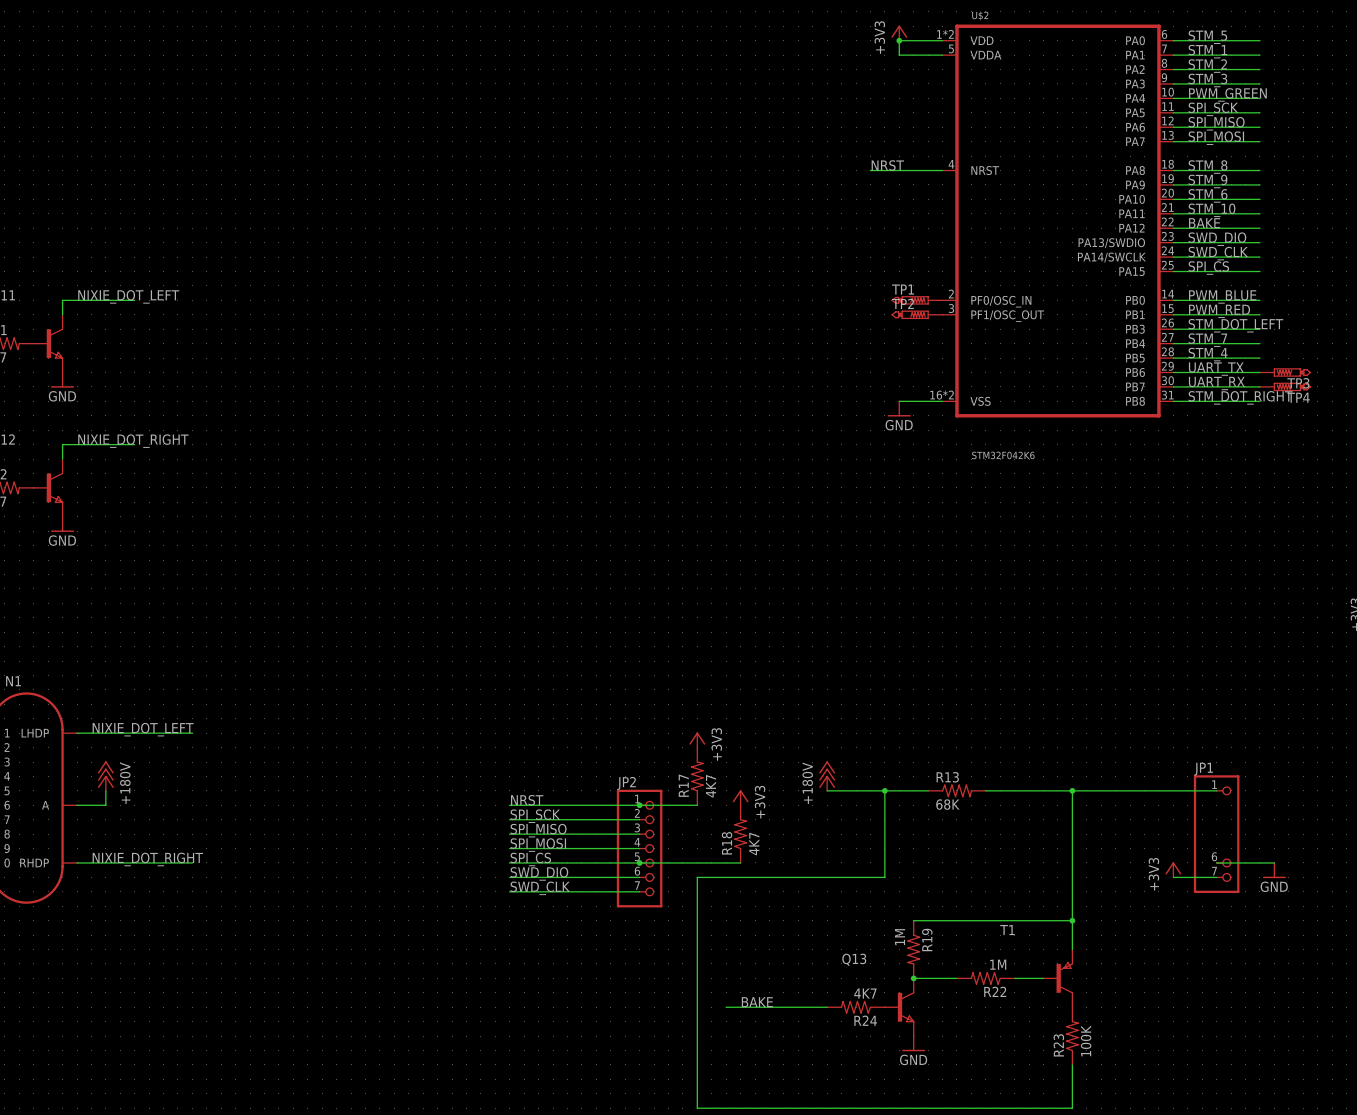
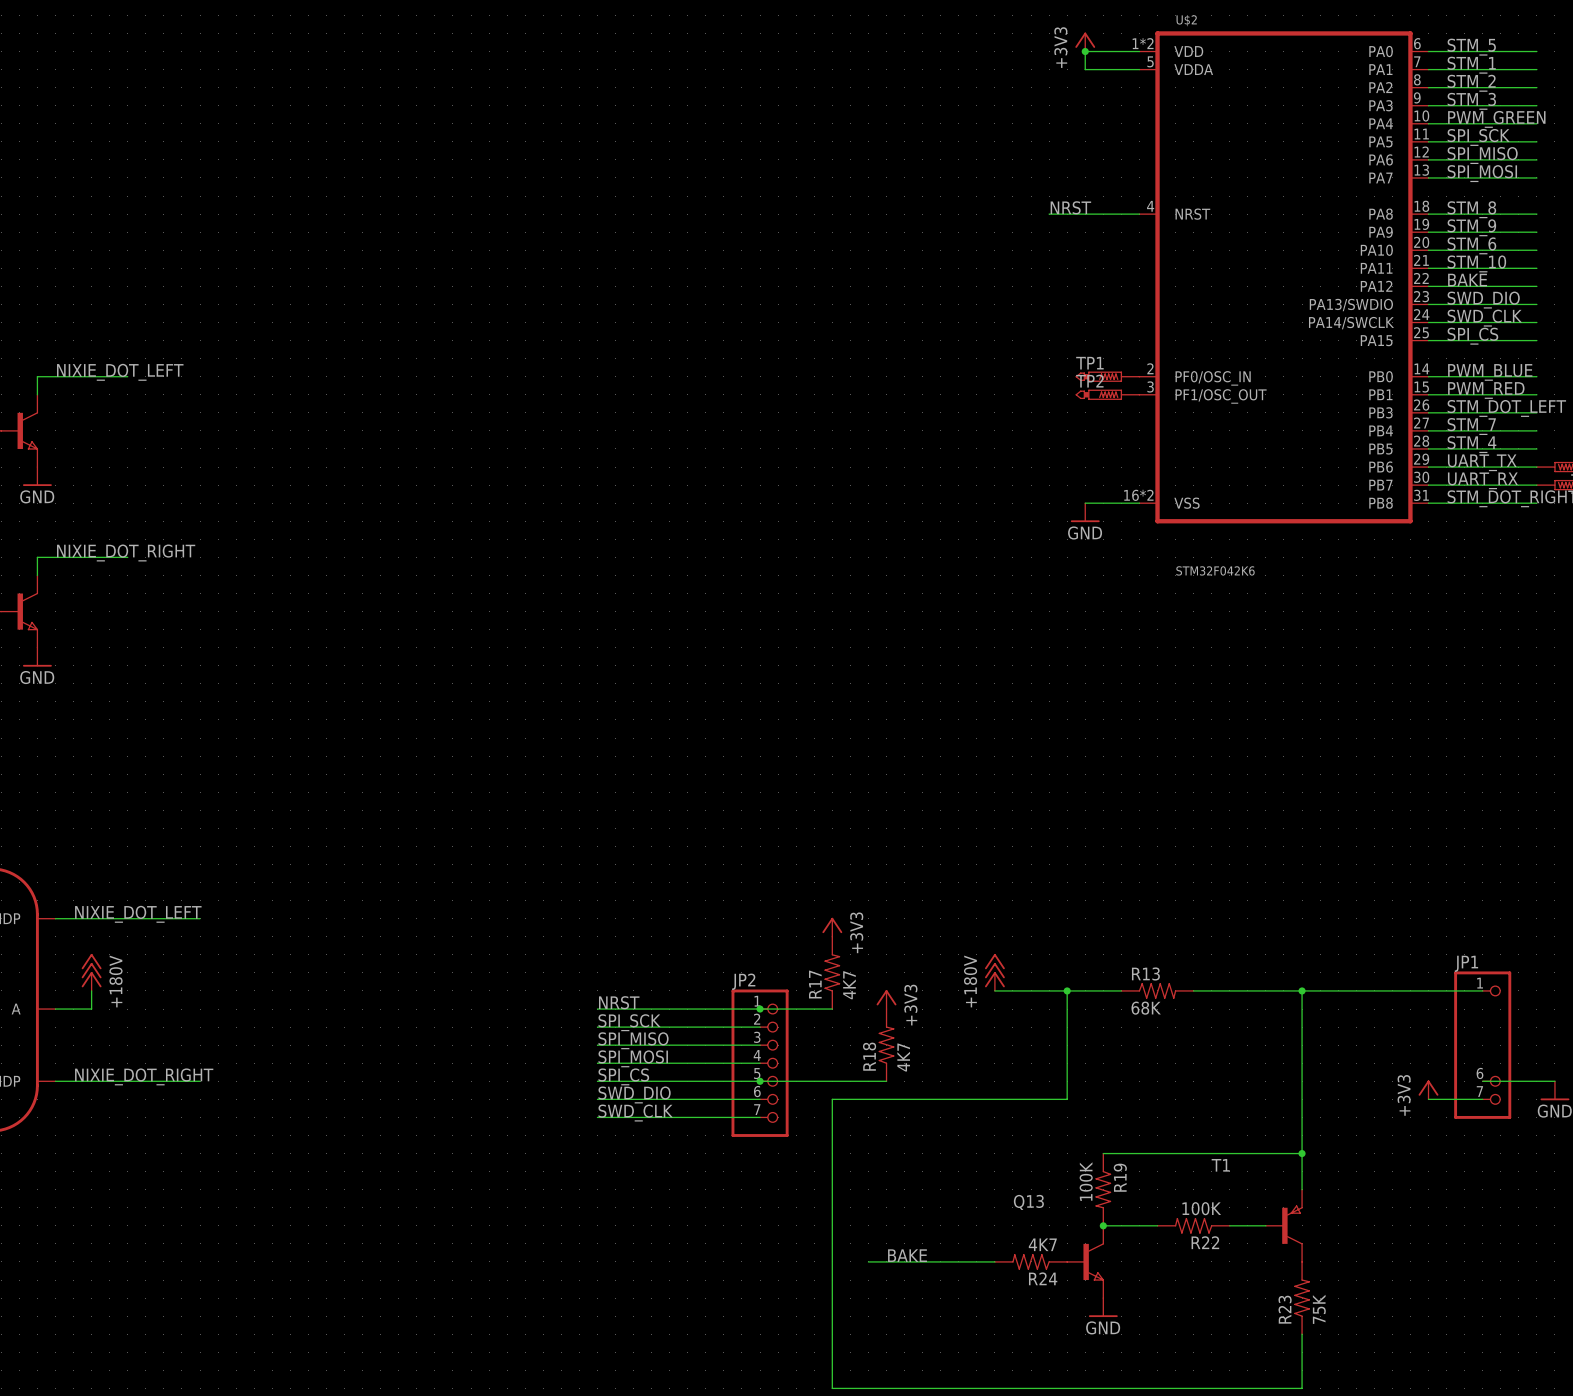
R19 value: 1M (900, 937) -> 100K (1086, 1181)
R22 value: 1M (998, 964) -> 100K (1201, 1208)
R23 value: 100K (1086, 1040) -> 75K (1319, 1309)

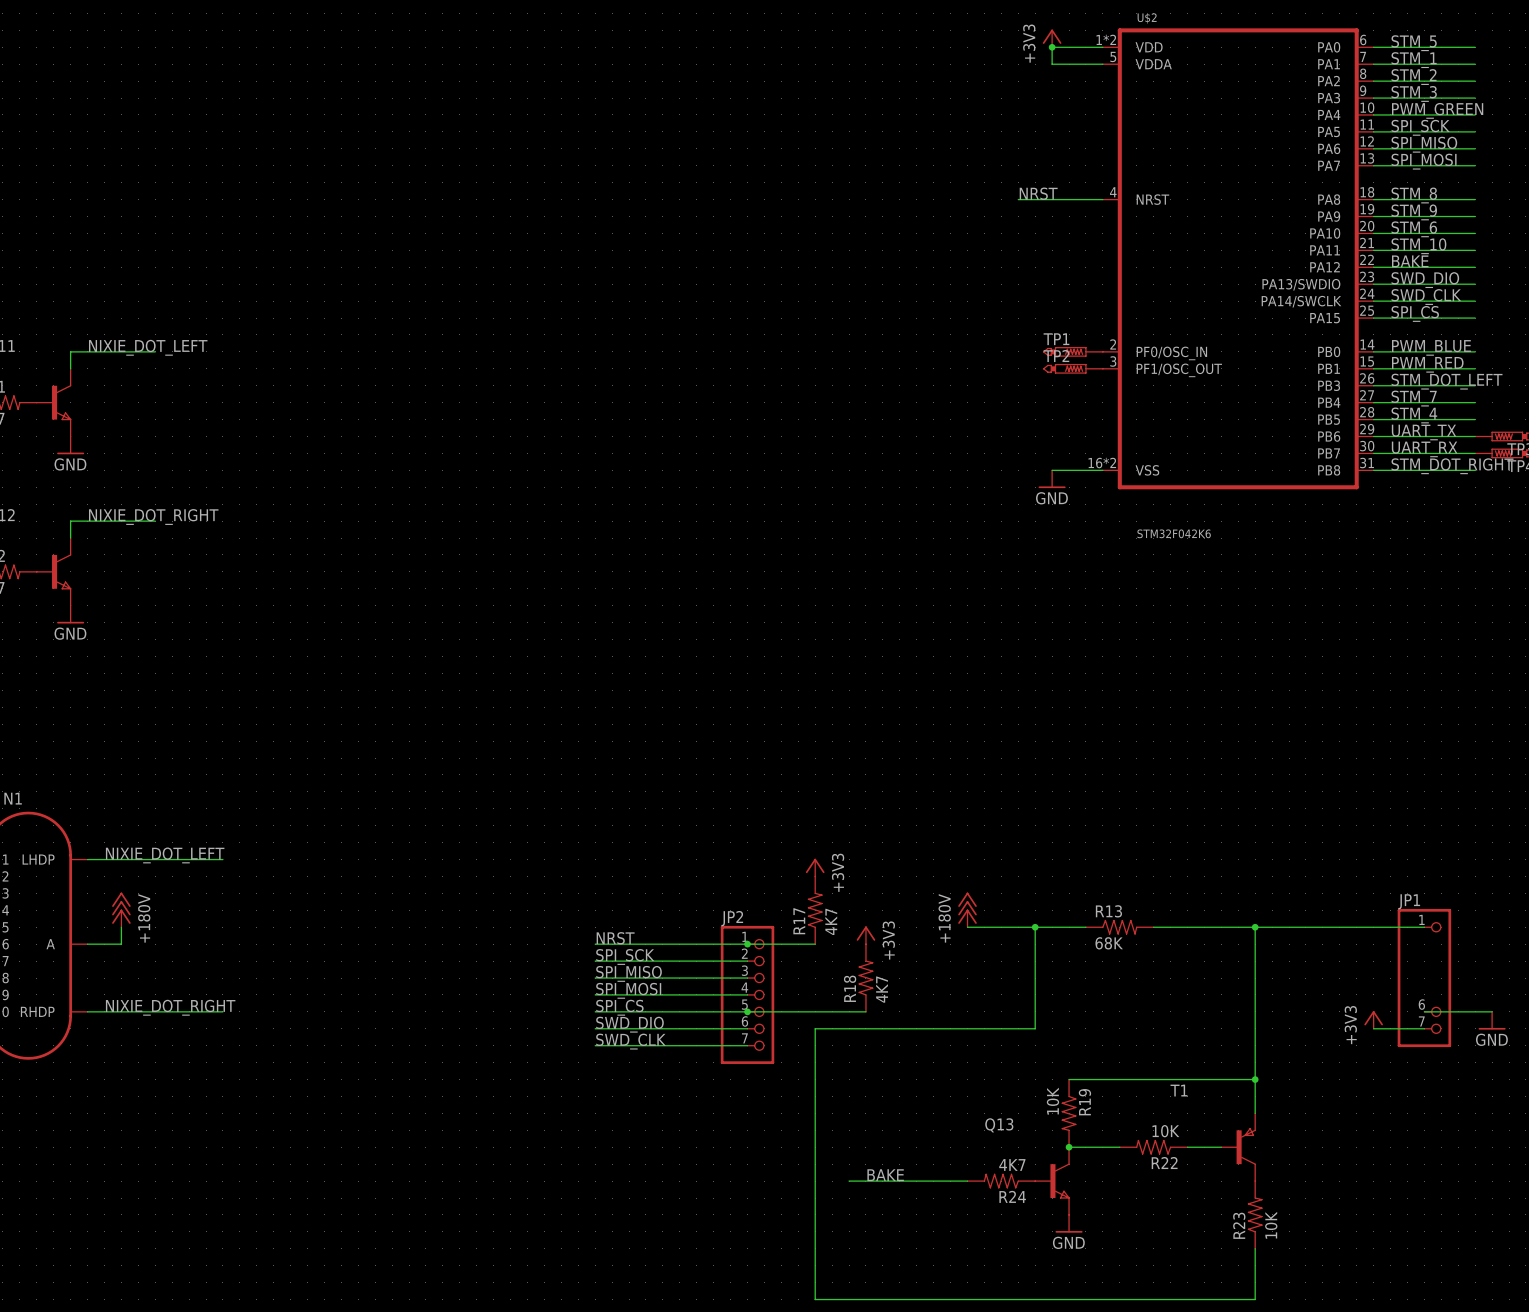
R19 value: 100K (1086, 1181) -> 10K (1052, 1101)
R22 value: 100K (1201, 1208) -> 10K (1165, 1131)
R23 value: 75K (1319, 1309) -> 10K (1271, 1225)

